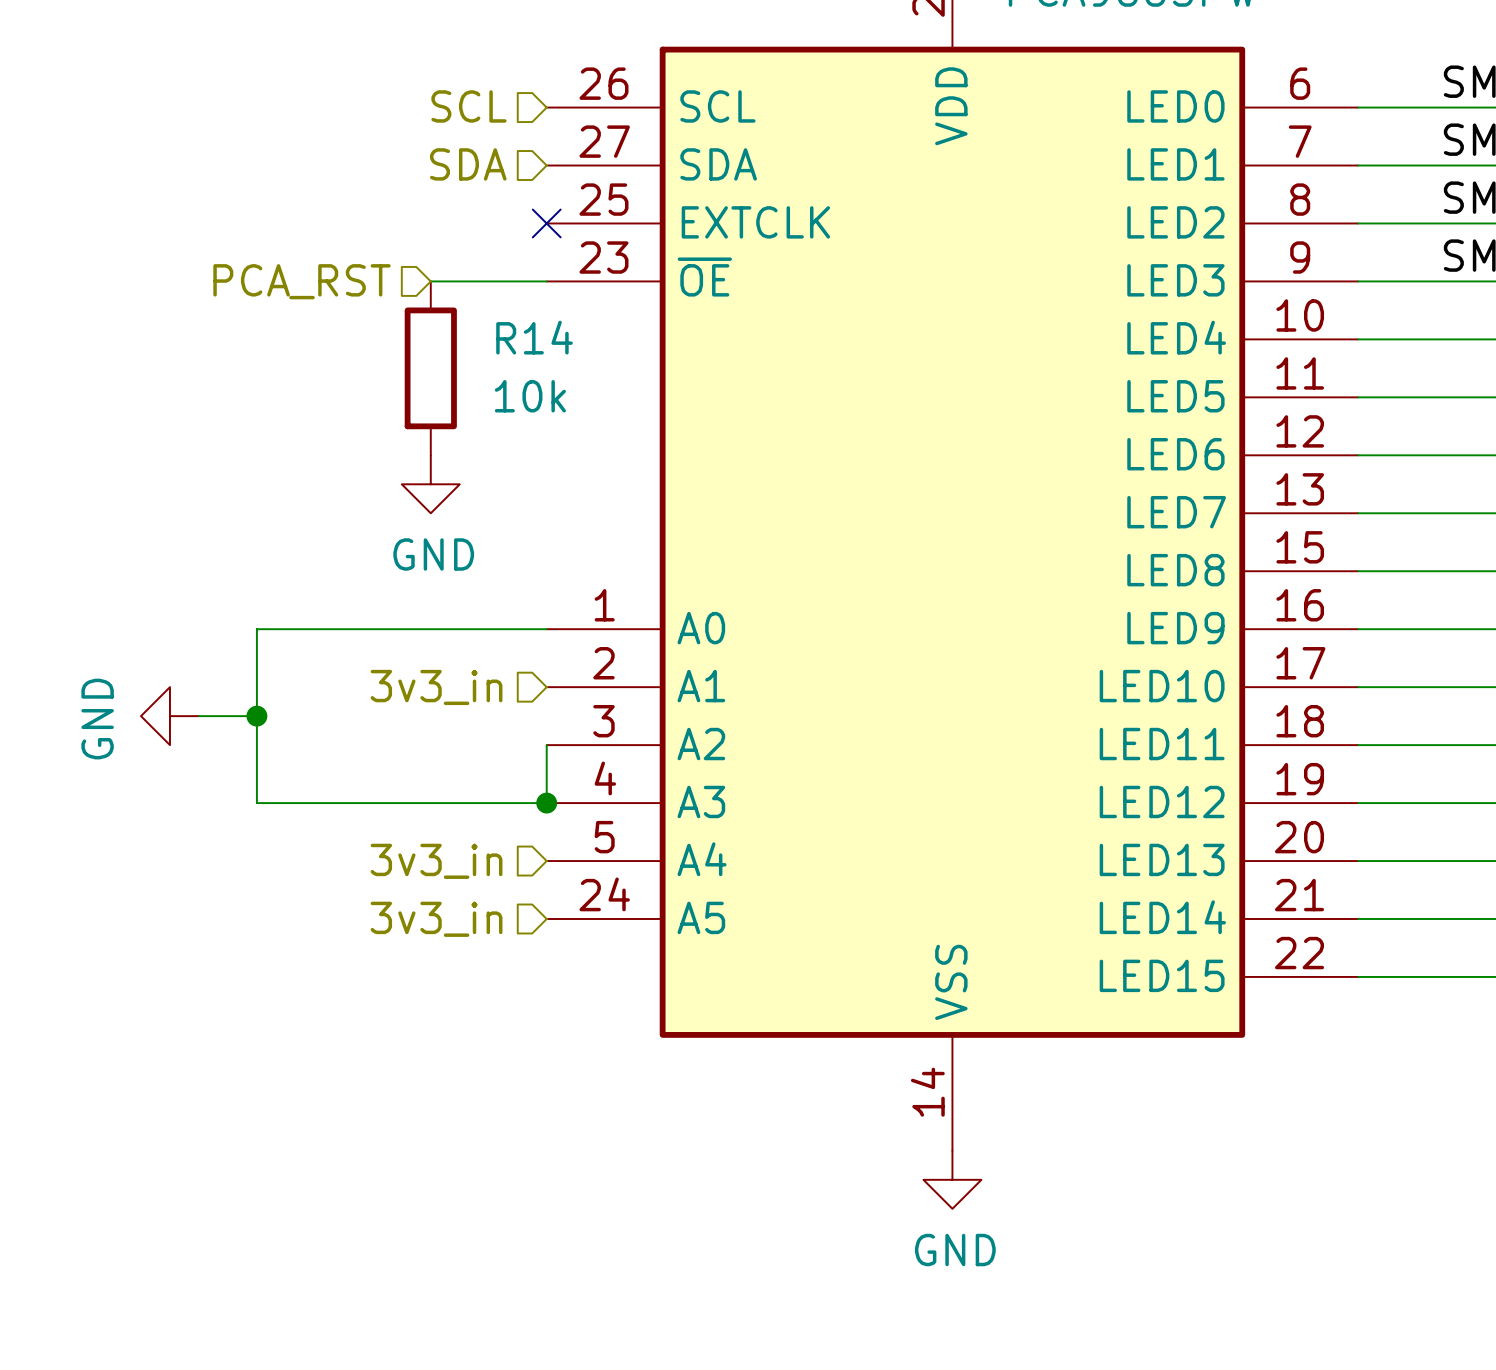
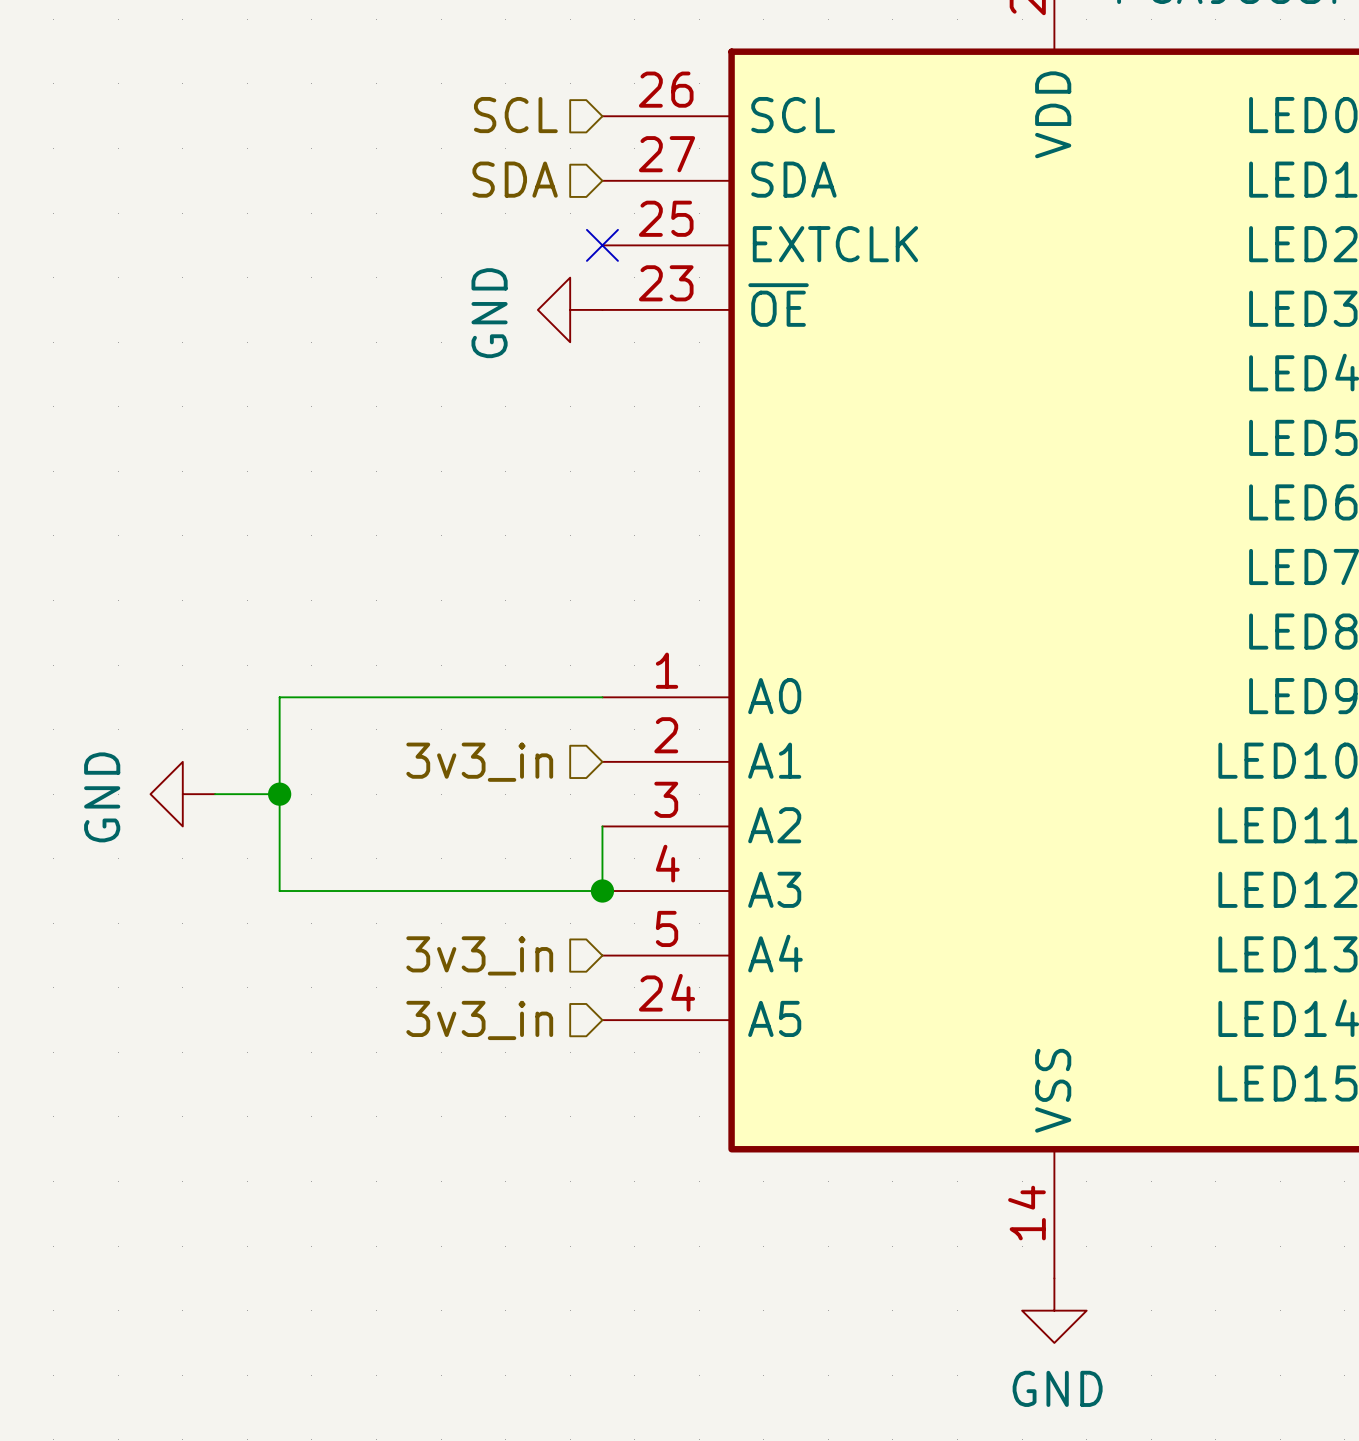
hierarchical label: PCA_RST (302, 281) -> none
wire: (430, 281) (546, 281) -> none
R14: 10k (430, 368) -> none
power symbol rotation: 0° (430, 484) -> 90° clockwise (570, 309)
power symbol position: GND (430, 484) -> GND (570, 309)

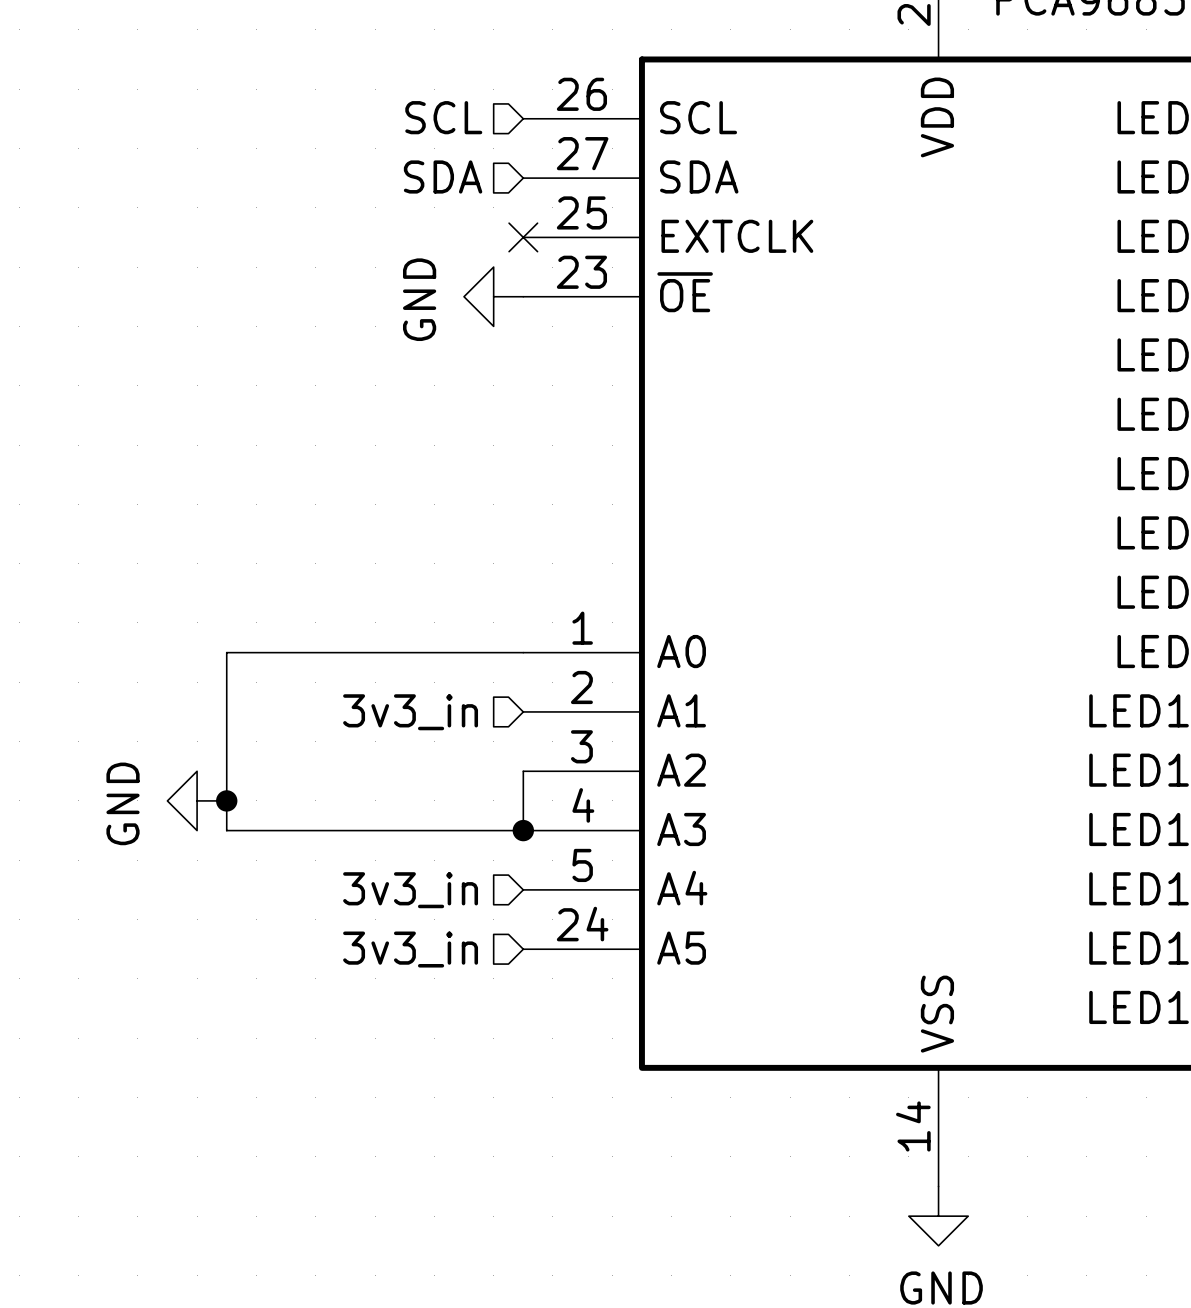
power symbol position: GND (182, 794) -> GND (197, 800)
wire: (215, 794) (279, 794) -> none
junction position: (279, 794) -> (226, 800)

